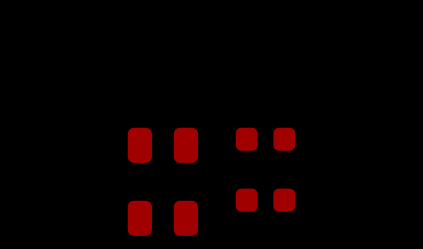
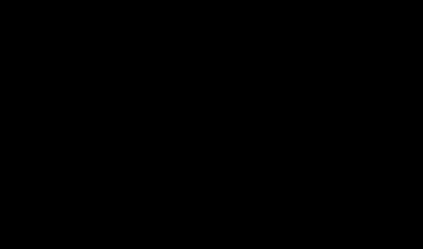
part: (265, 139) -> none
part: (162, 145) -> none
part: (265, 200) -> none
part: (162, 218) -> none

